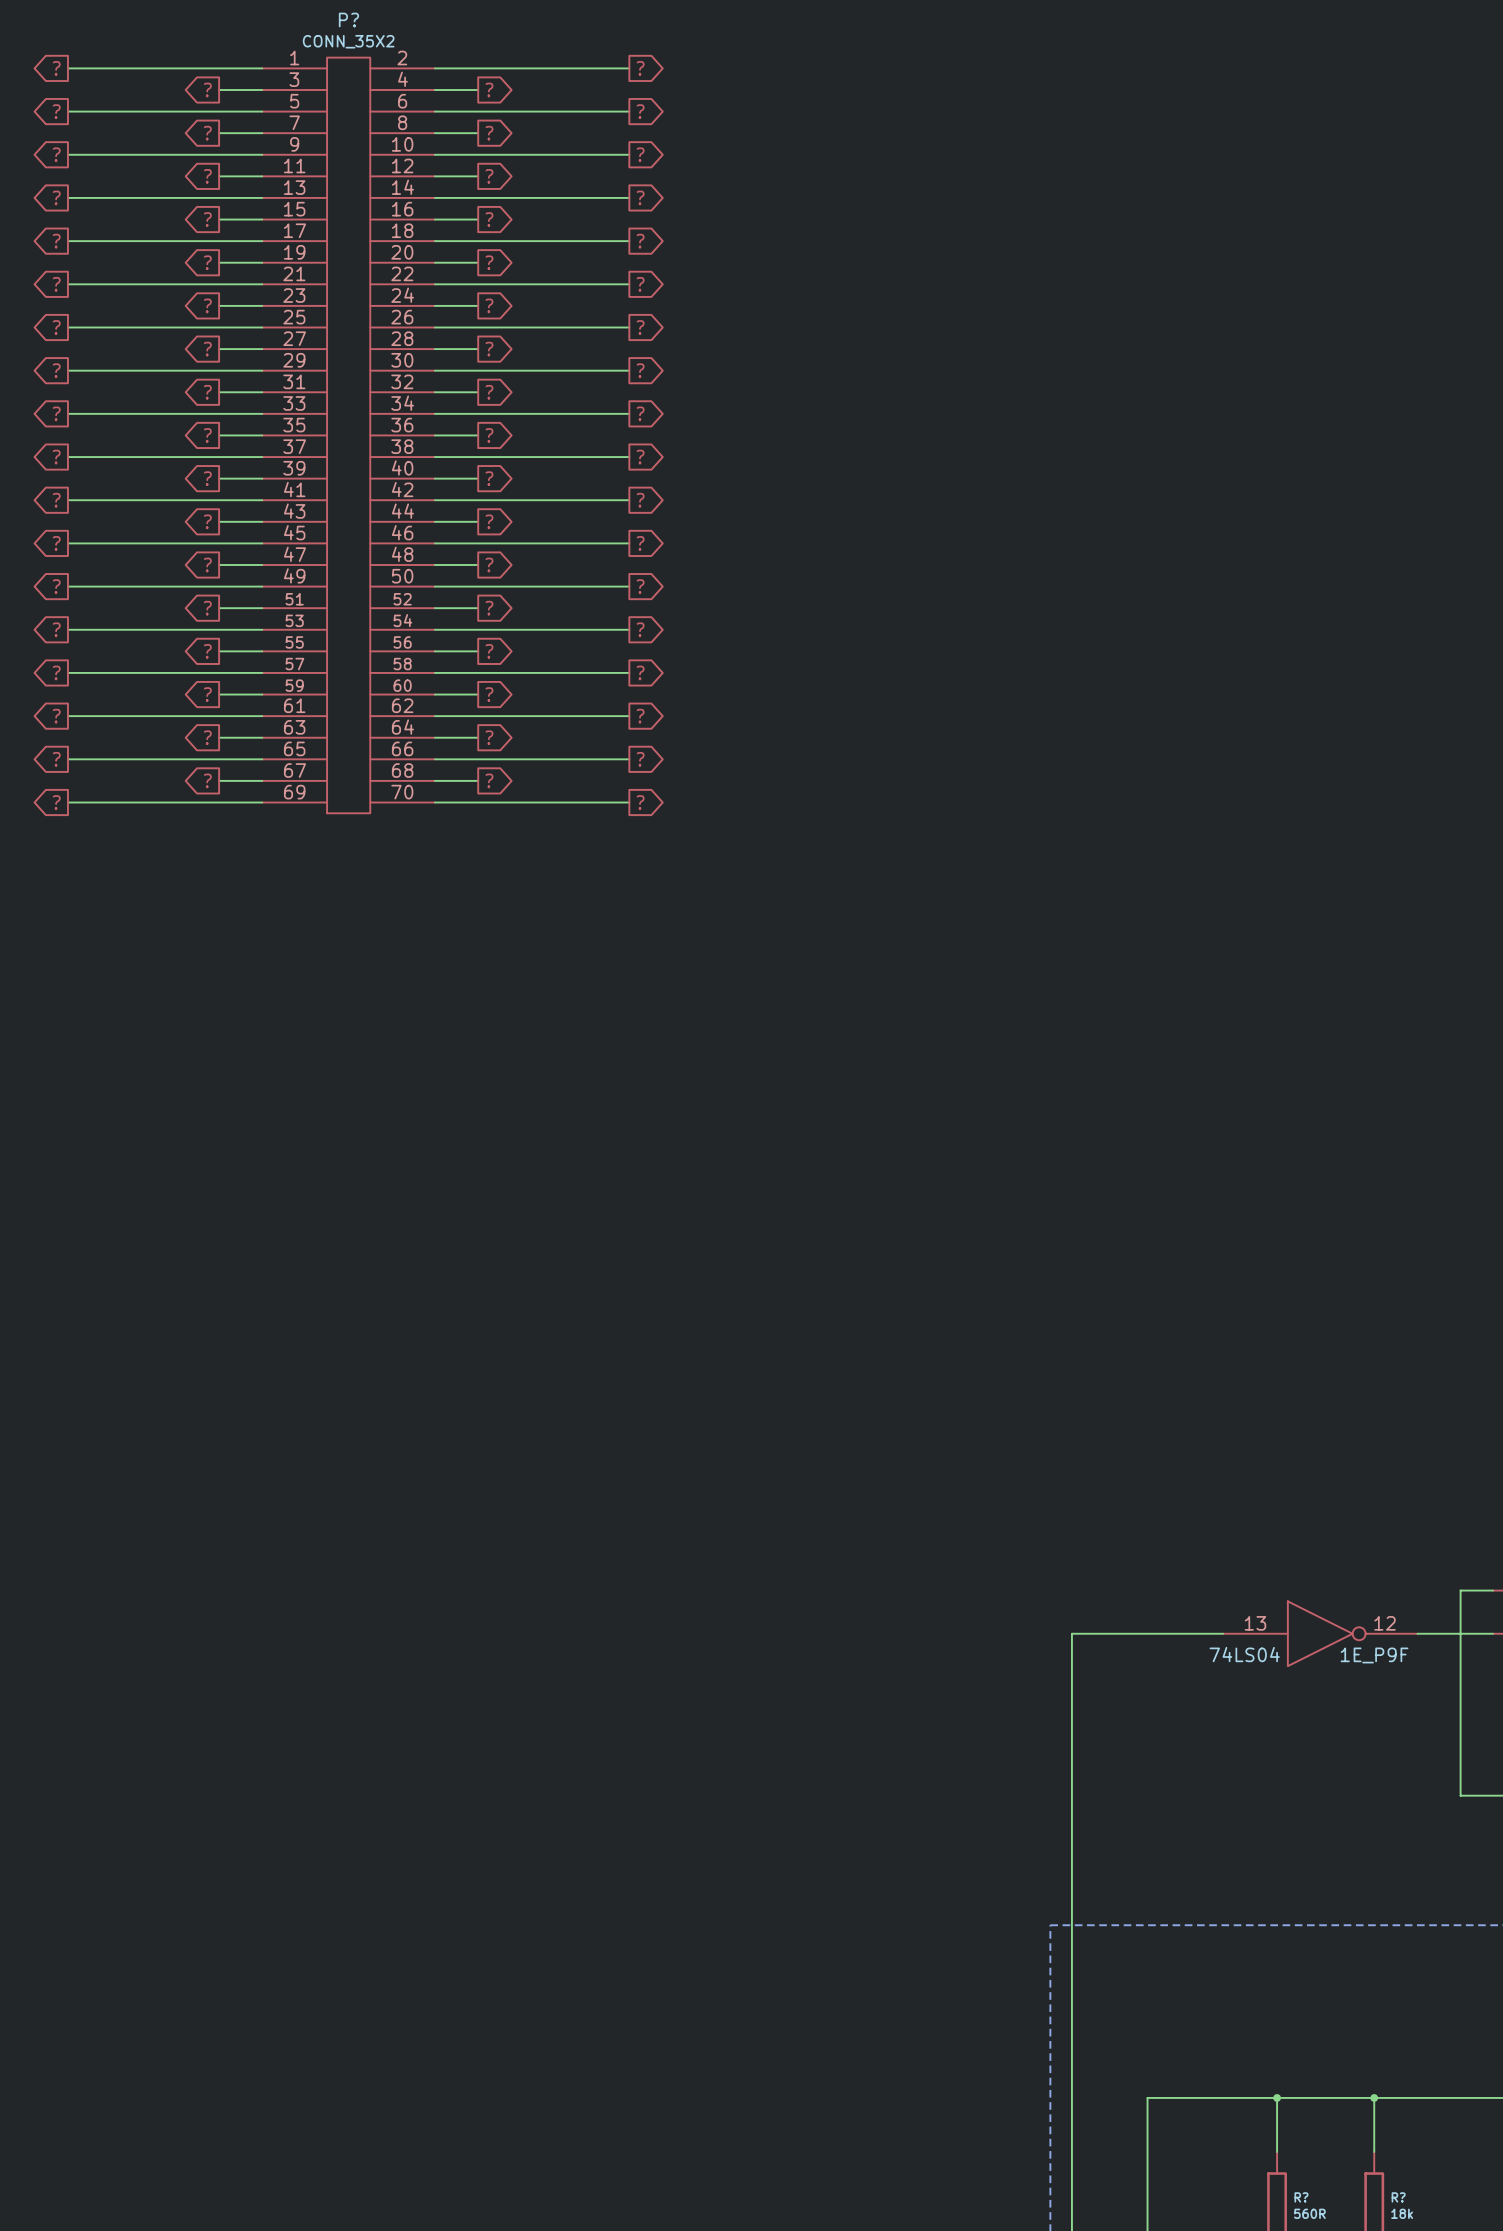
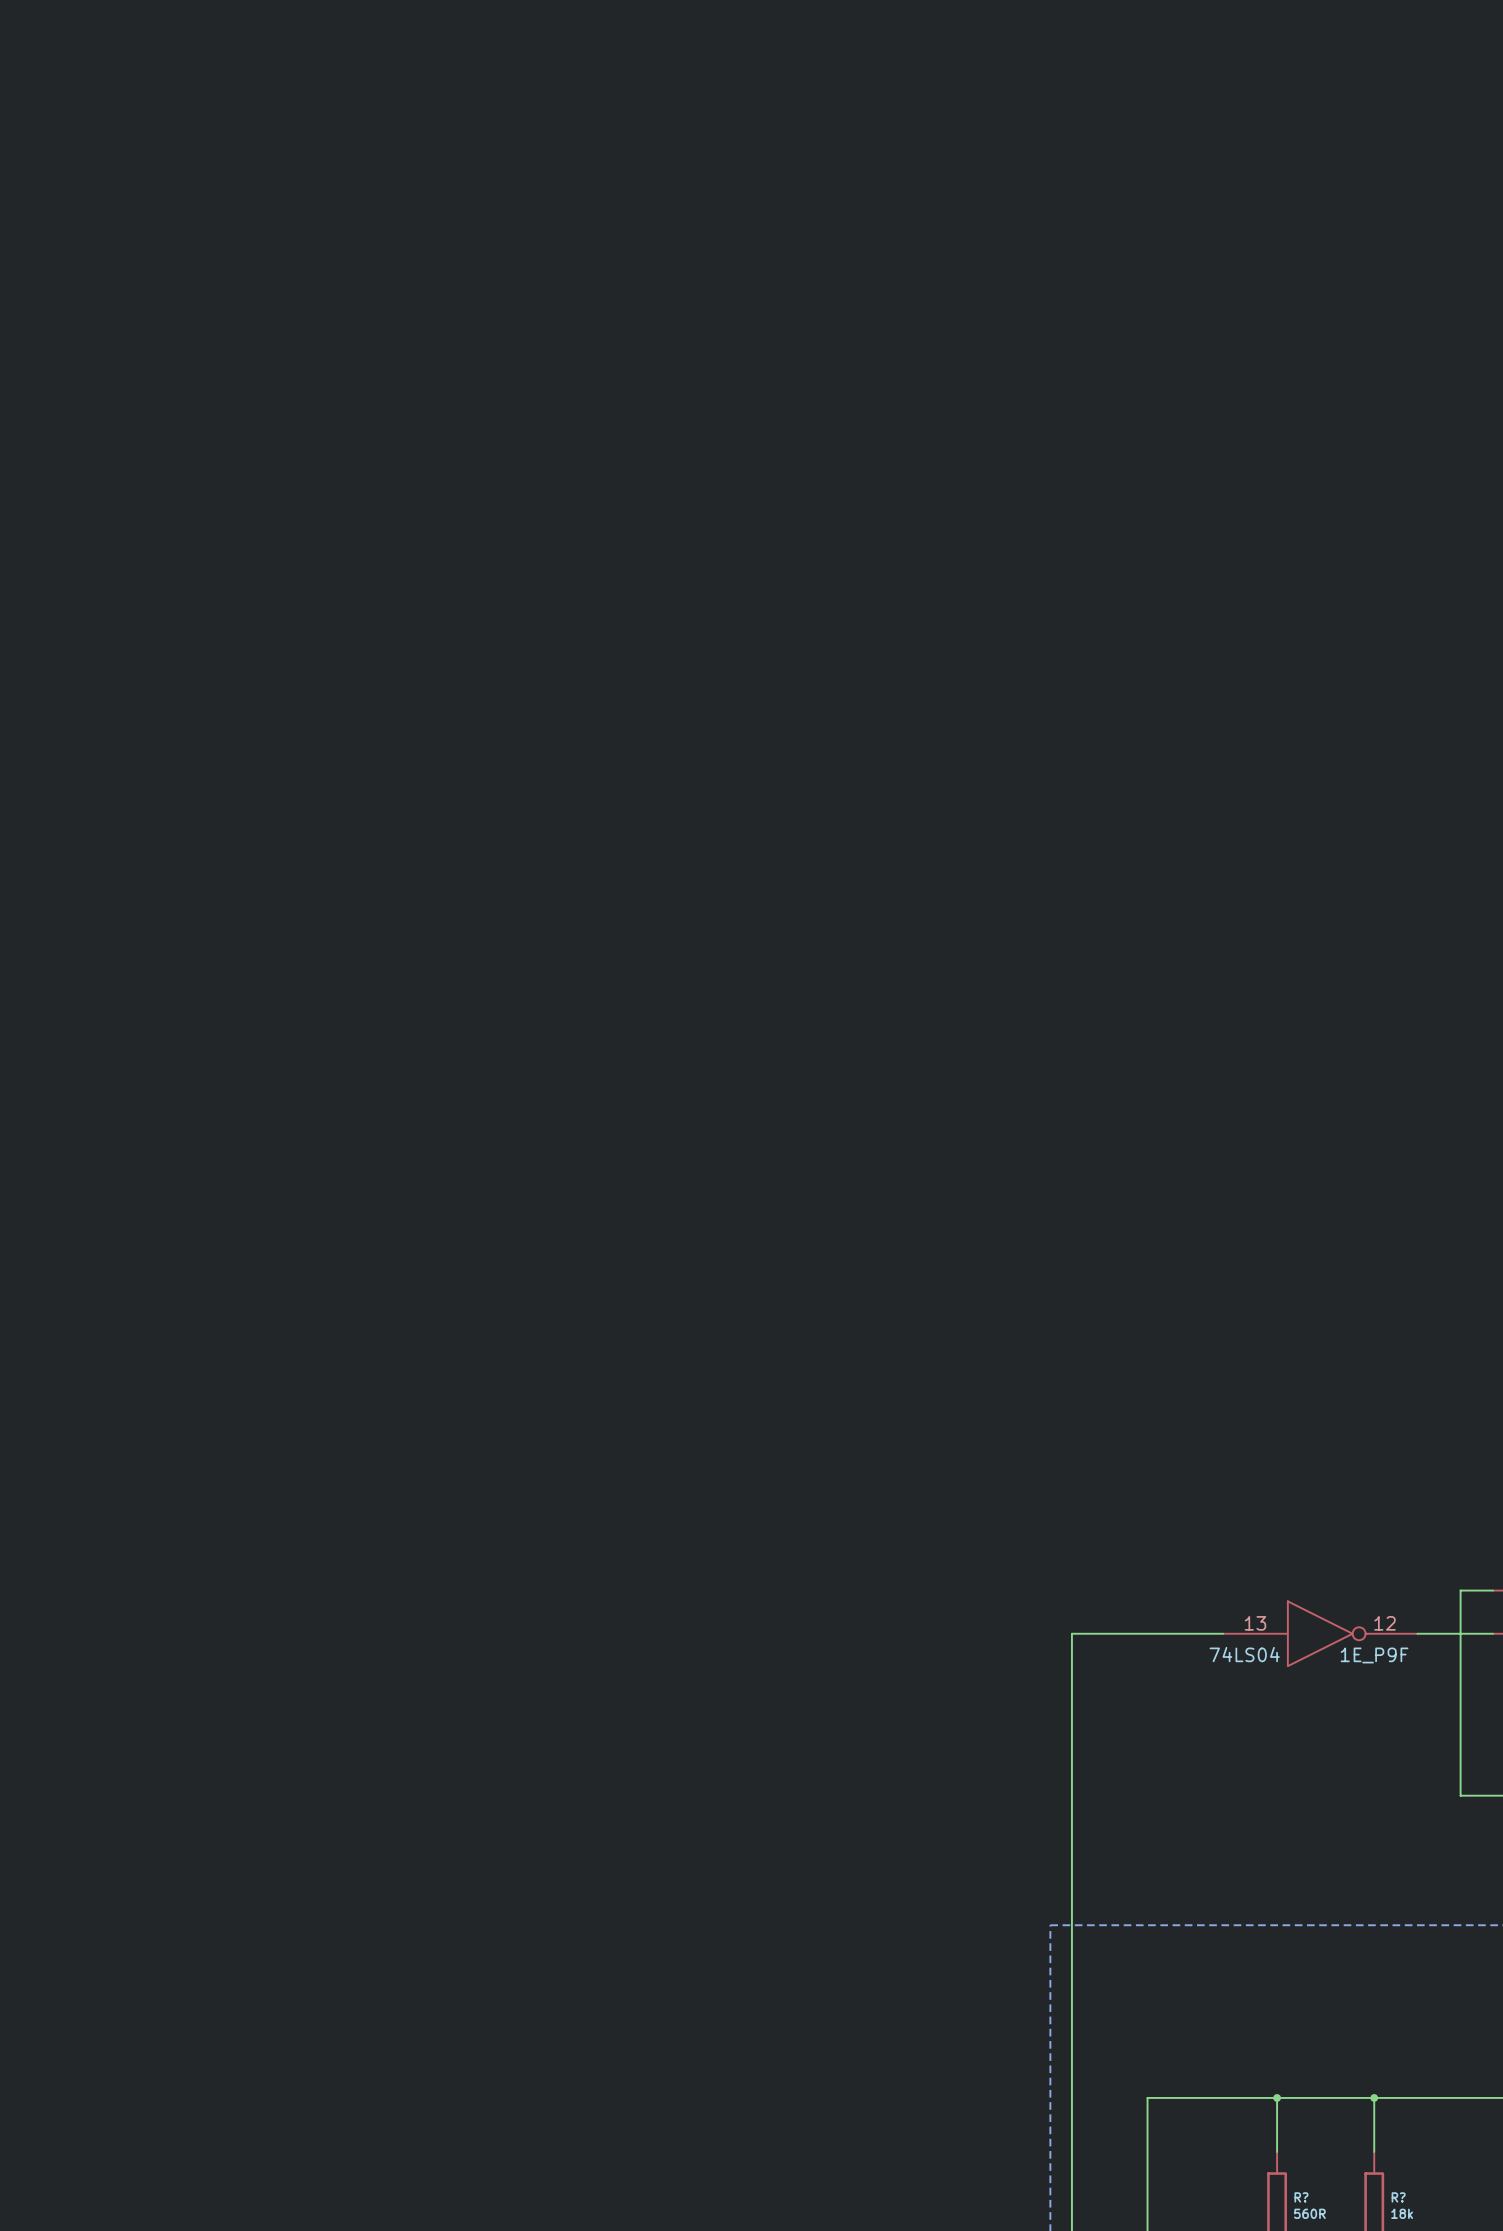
global label: ? (56, 68) -> none
wire: (67, 68) (262, 68) -> none
wire: (435, 68) (629, 68) -> none
global label: ? (640, 68) -> none
global label: ? (207, 89) -> none
wire: (219, 89) (262, 89) -> none
wire: (435, 89) (478, 89) -> none
global label: ? (489, 89) -> none
global label: ? (56, 111) -> none
wire: (67, 111) (262, 111) -> none
wire: (435, 111) (629, 111) -> none
global label: ? (640, 111) -> none
global label: ? (207, 133) -> none
wire: (219, 133) (262, 133) -> none
wire: (435, 133) (478, 133) -> none
global label: ? (489, 133) -> none
global label: ? (56, 154) -> none
wire: (67, 154) (262, 154) -> none
wire: (435, 154) (629, 154) -> none
global label: ? (640, 154) -> none
global label: ? (207, 176) -> none
wire: (219, 176) (262, 176) -> none
wire: (435, 176) (478, 176) -> none
global label: ? (489, 176) -> none
global label: ? (56, 197) -> none
wire: (67, 197) (262, 197) -> none
wire: (435, 197) (629, 197) -> none
global label: ? (640, 197) -> none
global label: ? (207, 219) -> none
wire: (219, 219) (262, 219) -> none
wire: (435, 219) (478, 219) -> none
global label: ? (489, 219) -> none
global label: ? (56, 241) -> none
wire: (67, 241) (262, 241) -> none
wire: (435, 241) (629, 241) -> none
global label: ? (640, 241) -> none
global label: ? (207, 262) -> none
wire: (219, 262) (262, 262) -> none
wire: (435, 262) (478, 262) -> none
global label: ? (489, 262) -> none
global label: ? (56, 284) -> none
wire: (67, 284) (262, 284) -> none
wire: (435, 284) (629, 284) -> none
global label: ? (640, 284) -> none
global label: ? (207, 305) -> none
wire: (219, 305) (262, 305) -> none
wire: (435, 305) (478, 305) -> none
global label: ? (489, 305) -> none
global label: ? (56, 327) -> none
wire: (67, 327) (262, 327) -> none
wire: (435, 327) (629, 327) -> none
global label: ? (640, 327) -> none
global label: ? (207, 349) -> none
wire: (219, 349) (262, 349) -> none
wire: (435, 349) (478, 349) -> none
global label: ? (489, 349) -> none
global label: ? (56, 370) -> none
wire: (67, 370) (262, 370) -> none
wire: (435, 370) (629, 370) -> none
global label: ? (640, 370) -> none
global label: ? (207, 392) -> none
wire: (219, 392) (262, 392) -> none
wire: (435, 392) (478, 392) -> none
global label: ? (489, 392) -> none
global label: ? (56, 413) -> none
wire: (67, 413) (262, 413) -> none
wire: (435, 413) (629, 413) -> none
global label: ? (640, 413) -> none
global label: ? (207, 435) -> none
wire: (219, 435) (262, 435) -> none
P?: CONN_35X2 (348, 435) -> none
wire: (435, 435) (478, 435) -> none
global label: ? (489, 435) -> none
global label: ? (56, 457) -> none
wire: (67, 457) (262, 457) -> none
wire: (435, 457) (629, 457) -> none
global label: ? (640, 457) -> none
global label: ? (207, 478) -> none
wire: (219, 478) (262, 478) -> none
wire: (435, 478) (478, 478) -> none
global label: ? (489, 478) -> none
global label: ? (56, 500) -> none
wire: (67, 500) (262, 500) -> none
wire: (435, 500) (629, 500) -> none
global label: ? (640, 500) -> none
global label: ? (207, 521) -> none
wire: (219, 521) (262, 521) -> none
wire: (435, 521) (478, 521) -> none
global label: ? (489, 521) -> none
global label: ? (56, 543) -> none
wire: (67, 543) (262, 543) -> none
wire: (435, 543) (629, 543) -> none
global label: ? (640, 543) -> none
global label: ? (207, 565) -> none
wire: (219, 565) (262, 565) -> none
wire: (435, 565) (478, 565) -> none
global label: ? (489, 565) -> none
global label: ? (56, 586) -> none
wire: (67, 586) (262, 586) -> none
wire: (435, 586) (629, 586) -> none
global label: ? (640, 586) -> none
global label: ? (207, 608) -> none
wire: (219, 608) (262, 608) -> none
wire: (435, 608) (478, 608) -> none
global label: ? (489, 608) -> none
global label: ? (56, 629) -> none
wire: (67, 629) (262, 629) -> none
wire: (435, 629) (629, 629) -> none
global label: ? (640, 629) -> none
global label: ? (207, 651) -> none
wire: (219, 651) (262, 651) -> none
wire: (435, 651) (478, 651) -> none
global label: ? (489, 651) -> none
global label: ? (56, 672) -> none
wire: (67, 672) (262, 672) -> none
wire: (435, 672) (629, 672) -> none
global label: ? (640, 672) -> none
global label: ? (207, 694) -> none
wire: (219, 694) (262, 694) -> none
wire: (435, 694) (478, 694) -> none
global label: ? (489, 694) -> none
global label: ? (56, 716) -> none
wire: (67, 716) (262, 716) -> none
wire: (435, 716) (629, 716) -> none
global label: ? (640, 716) -> none
global label: ? (207, 737) -> none
wire: (219, 737) (262, 737) -> none
wire: (435, 737) (478, 737) -> none
global label: ? (489, 737) -> none
global label: ? (56, 759) -> none
wire: (67, 759) (262, 759) -> none
wire: (435, 759) (629, 759) -> none
global label: ? (640, 759) -> none
global label: ? (207, 780) -> none
wire: (219, 780) (262, 780) -> none
wire: (435, 780) (478, 780) -> none
global label: ? (489, 780) -> none
global label: ? (56, 802) -> none
wire: (67, 802) (262, 802) -> none
wire: (435, 802) (629, 802) -> none
global label: ? (640, 802) -> none

